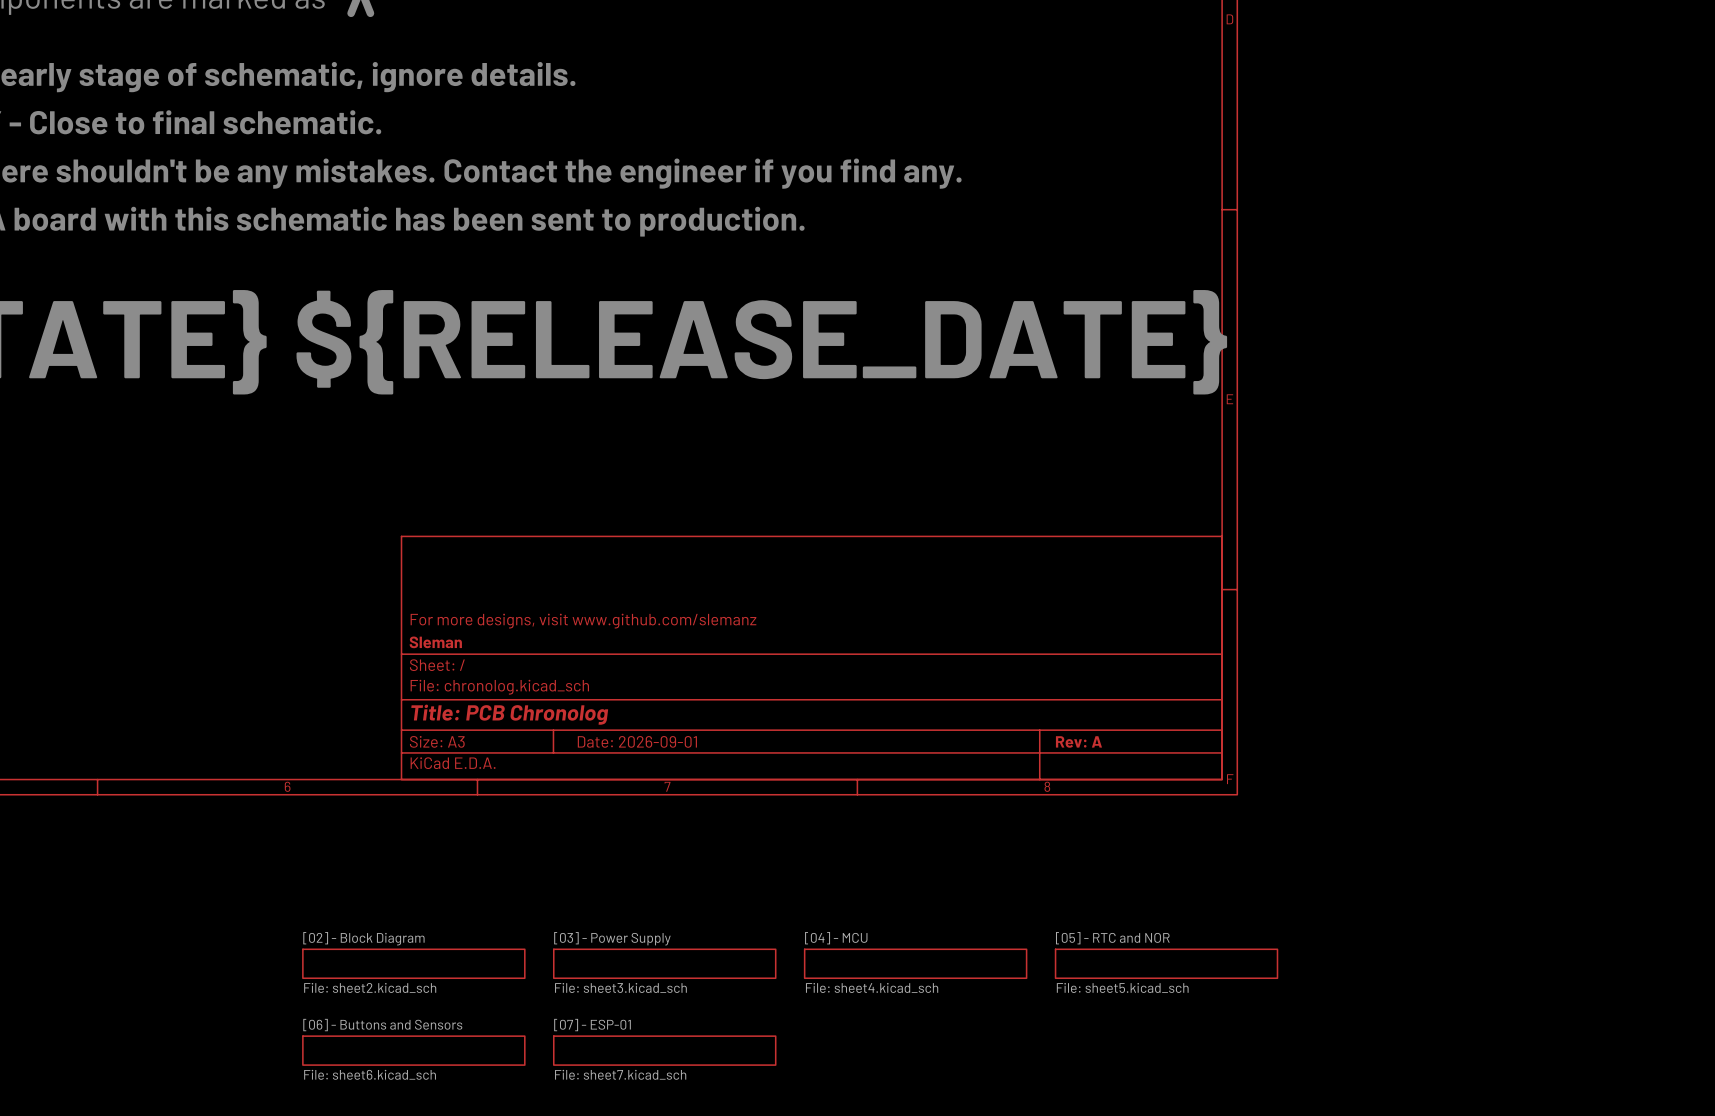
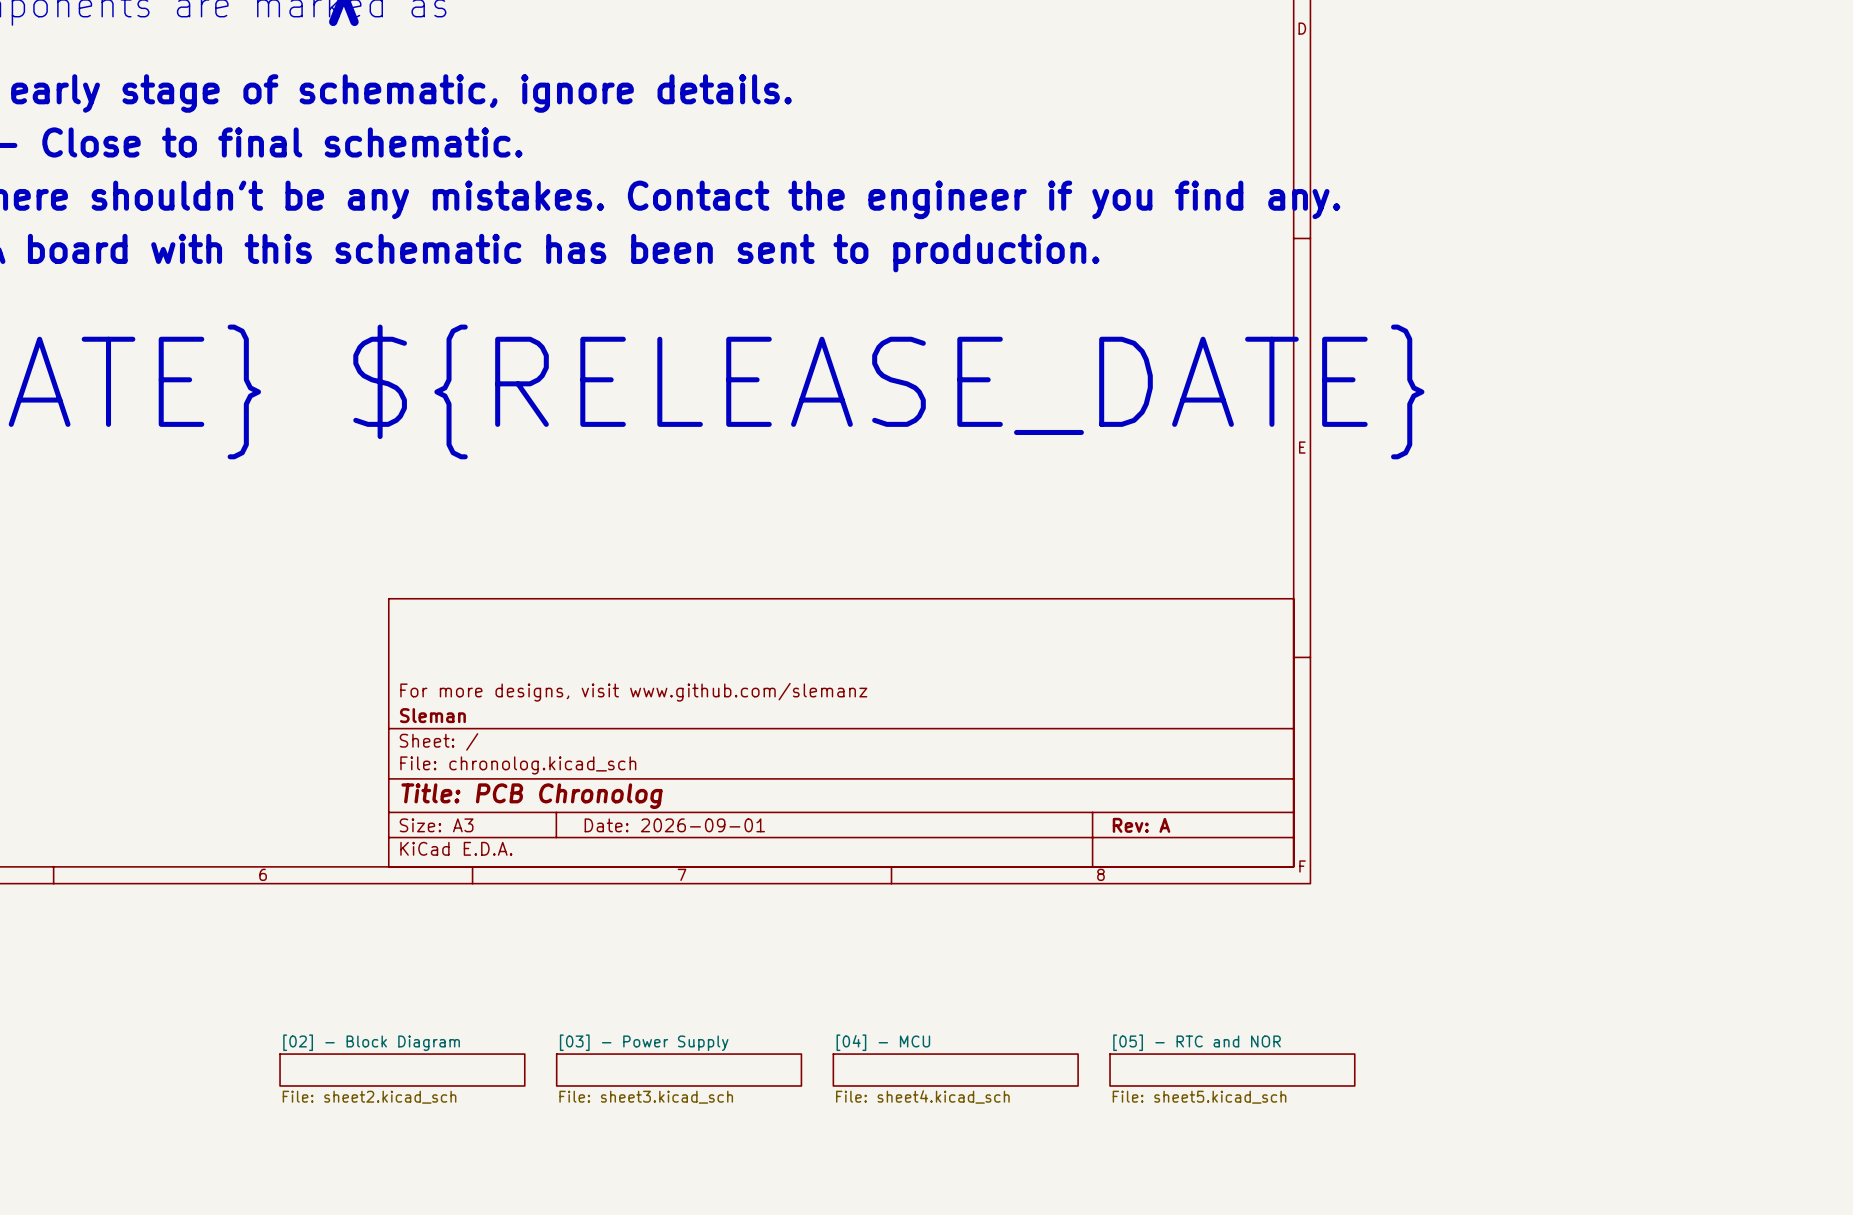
sheet [06] - Buttons and Sensors: File: sheet6.kicad_sch (413, 1050) -> none
sheet [07] - ESP-01: File: sheet7.kicad_sch (664, 1050) -> none

